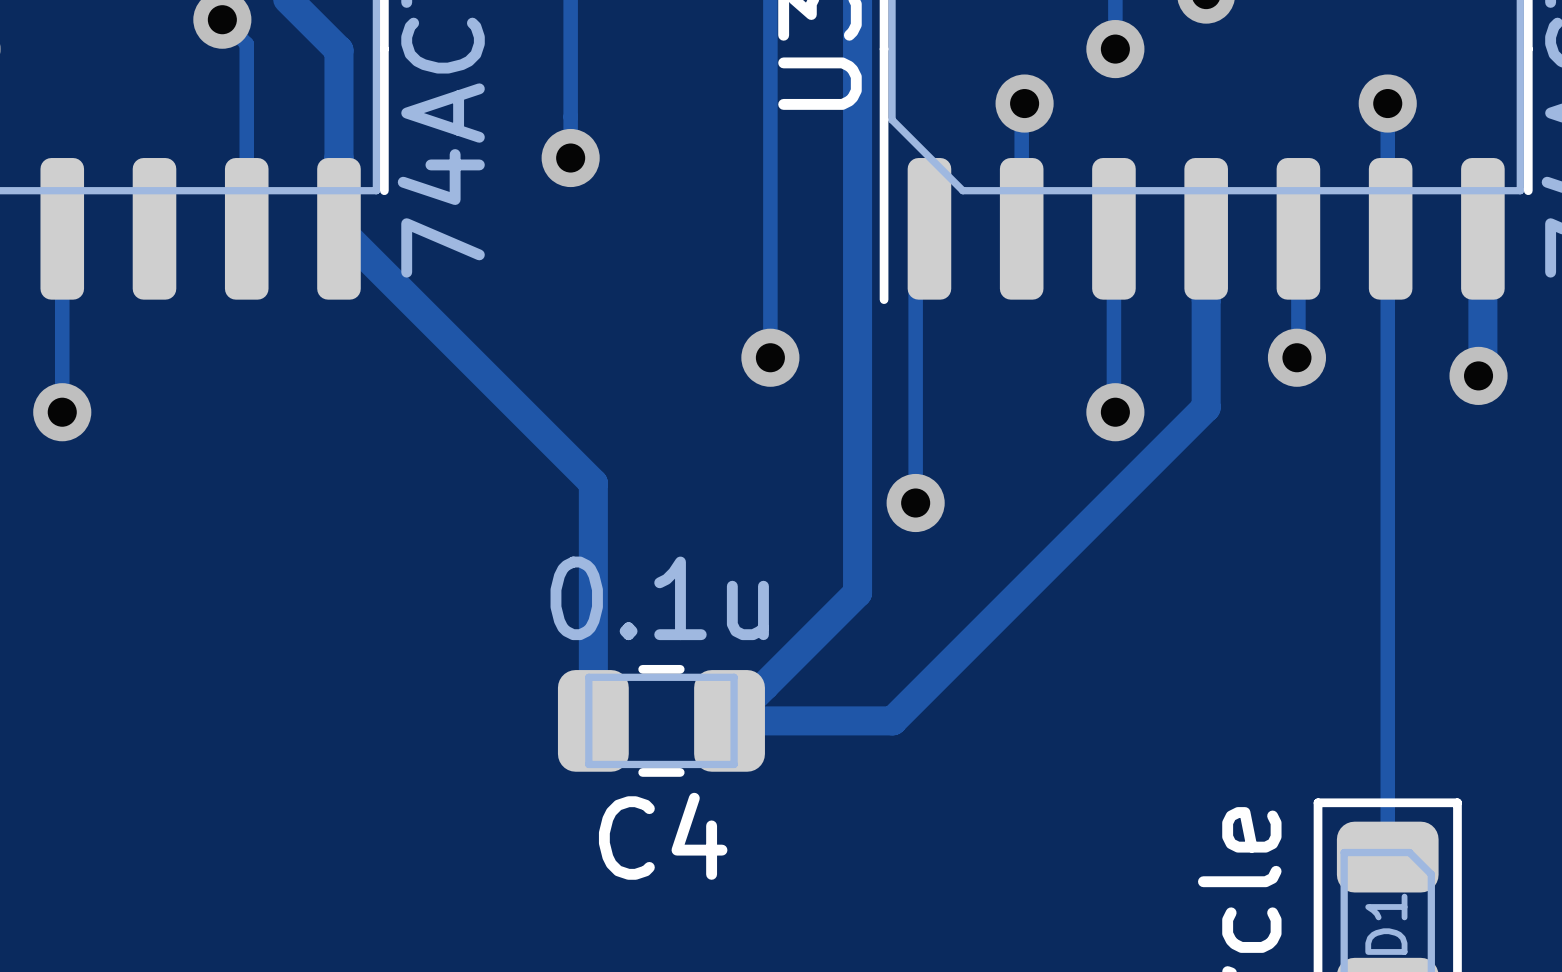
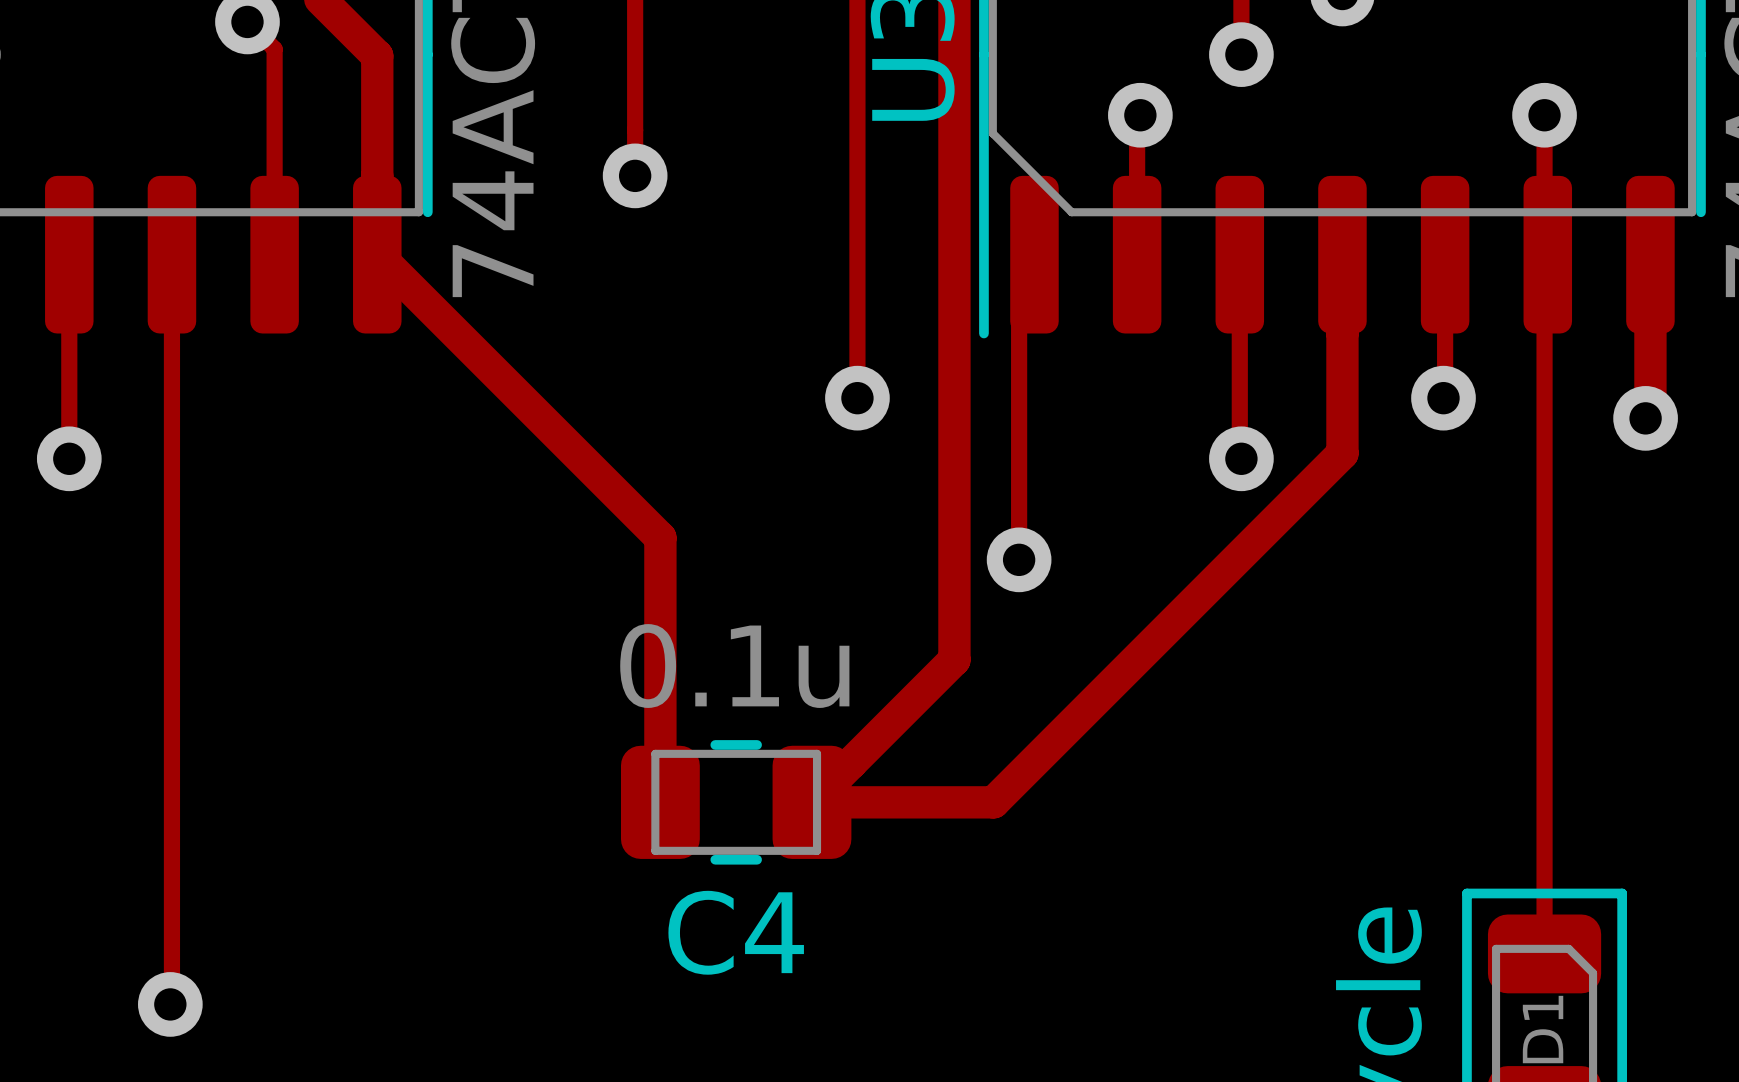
track: none -> (171, 254) (171, 1002) (170, 1004)
via: none -> (170, 1004)

